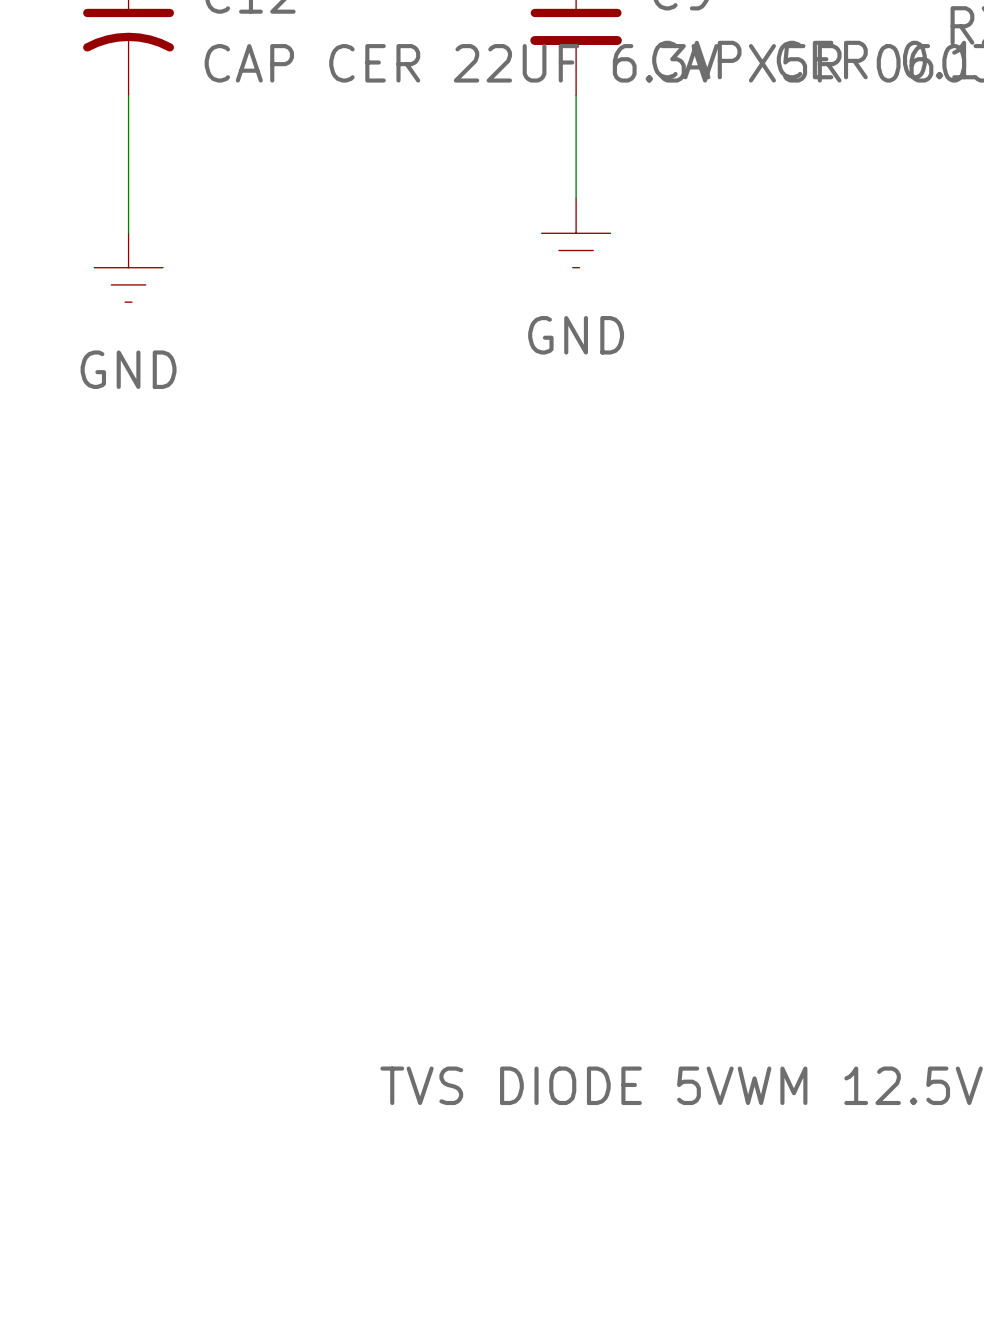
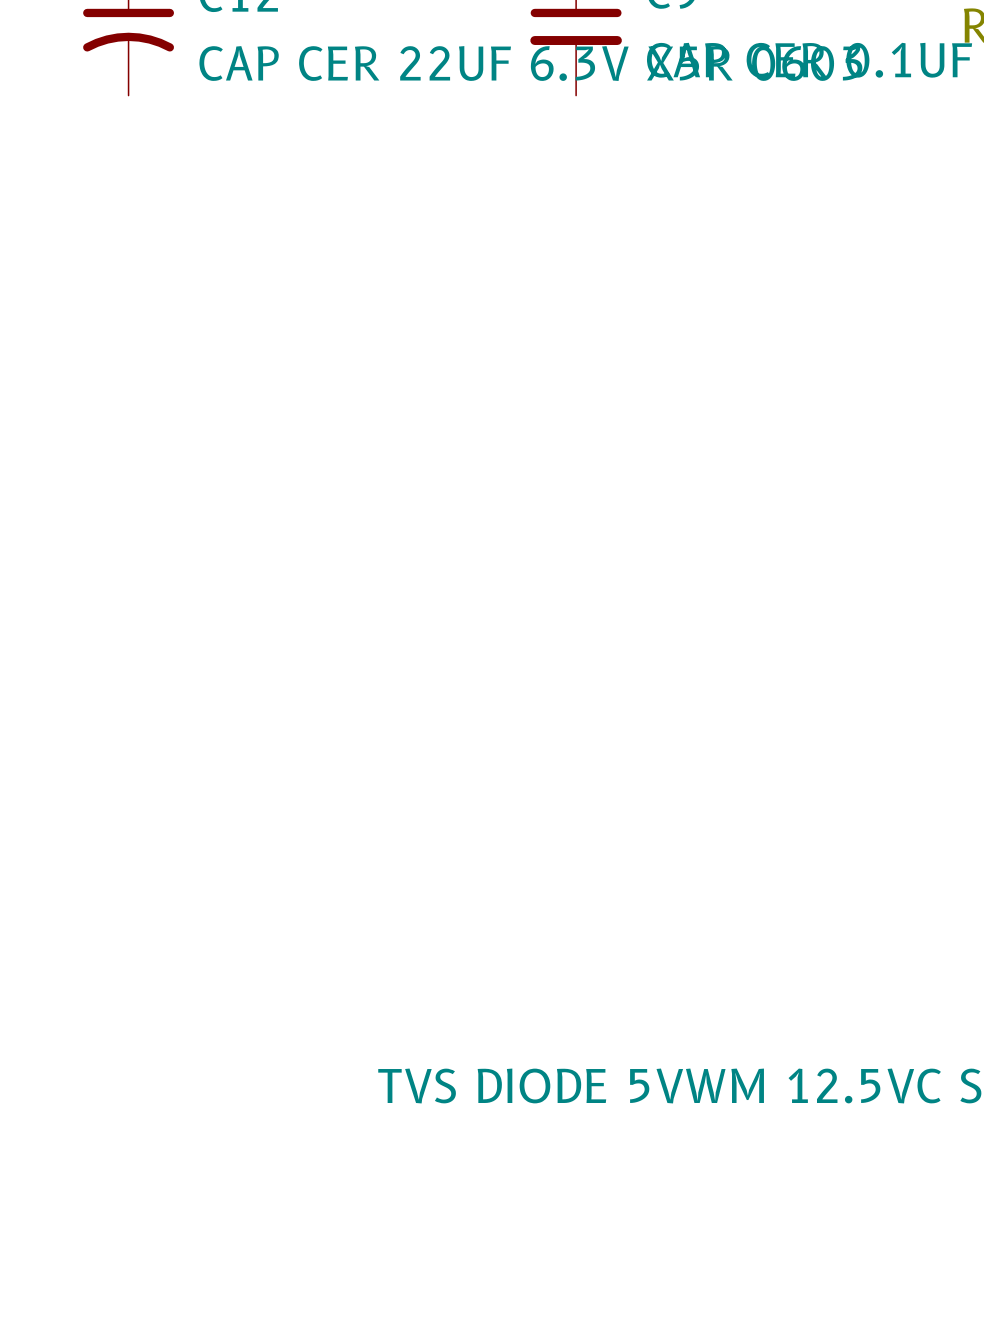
wire: (128, 95) (128, 233) -> none
wire: (576, 95) (576, 198) -> none
power symbol: GND (576, 233) -> none
power symbol: GND (128, 267) -> none

